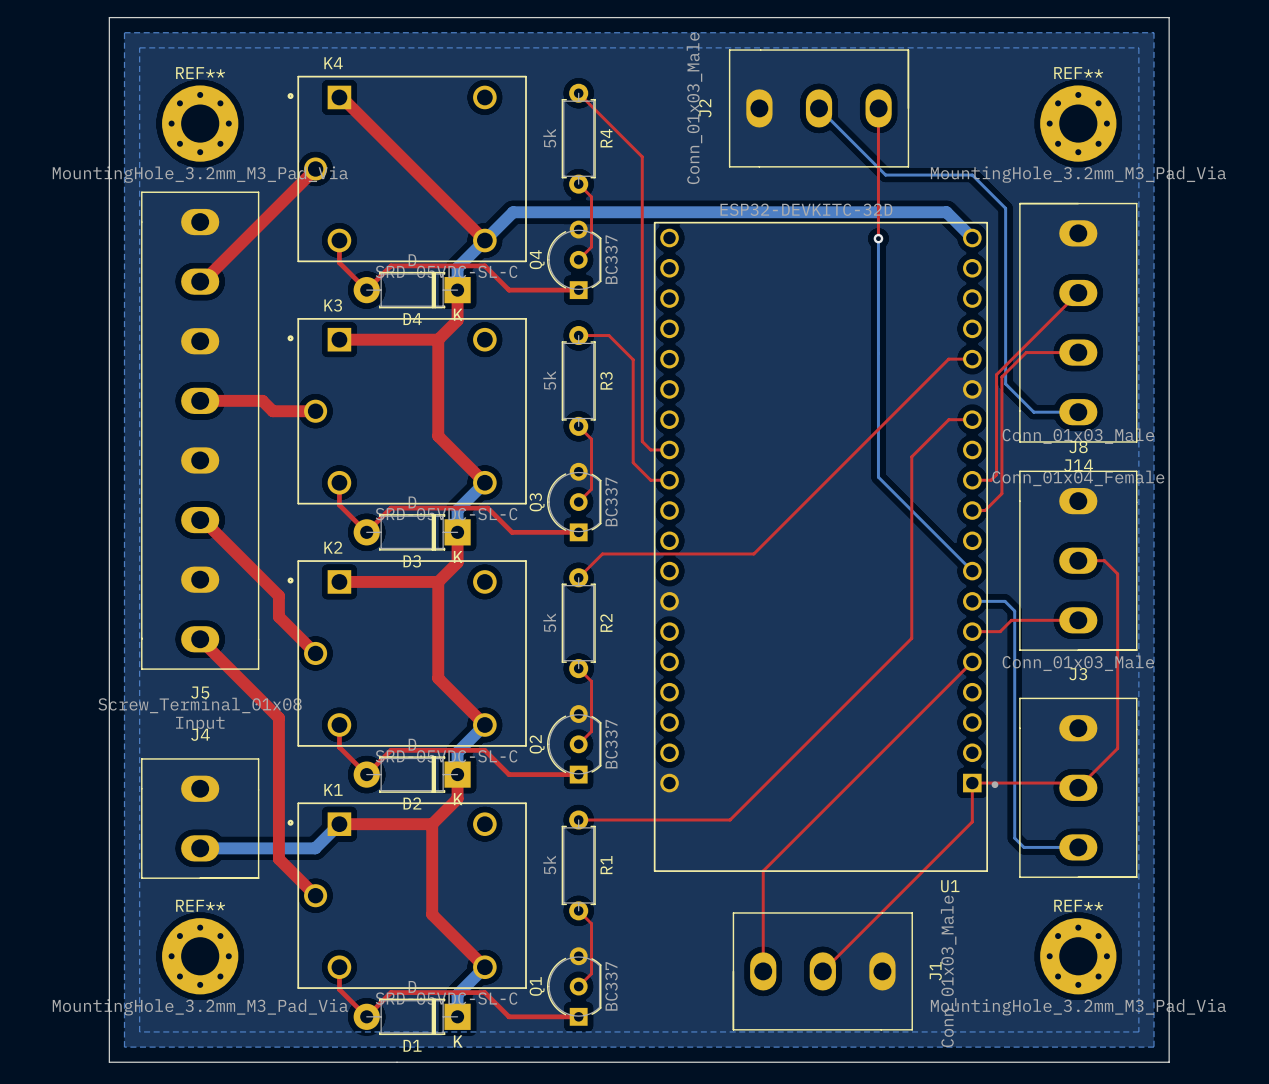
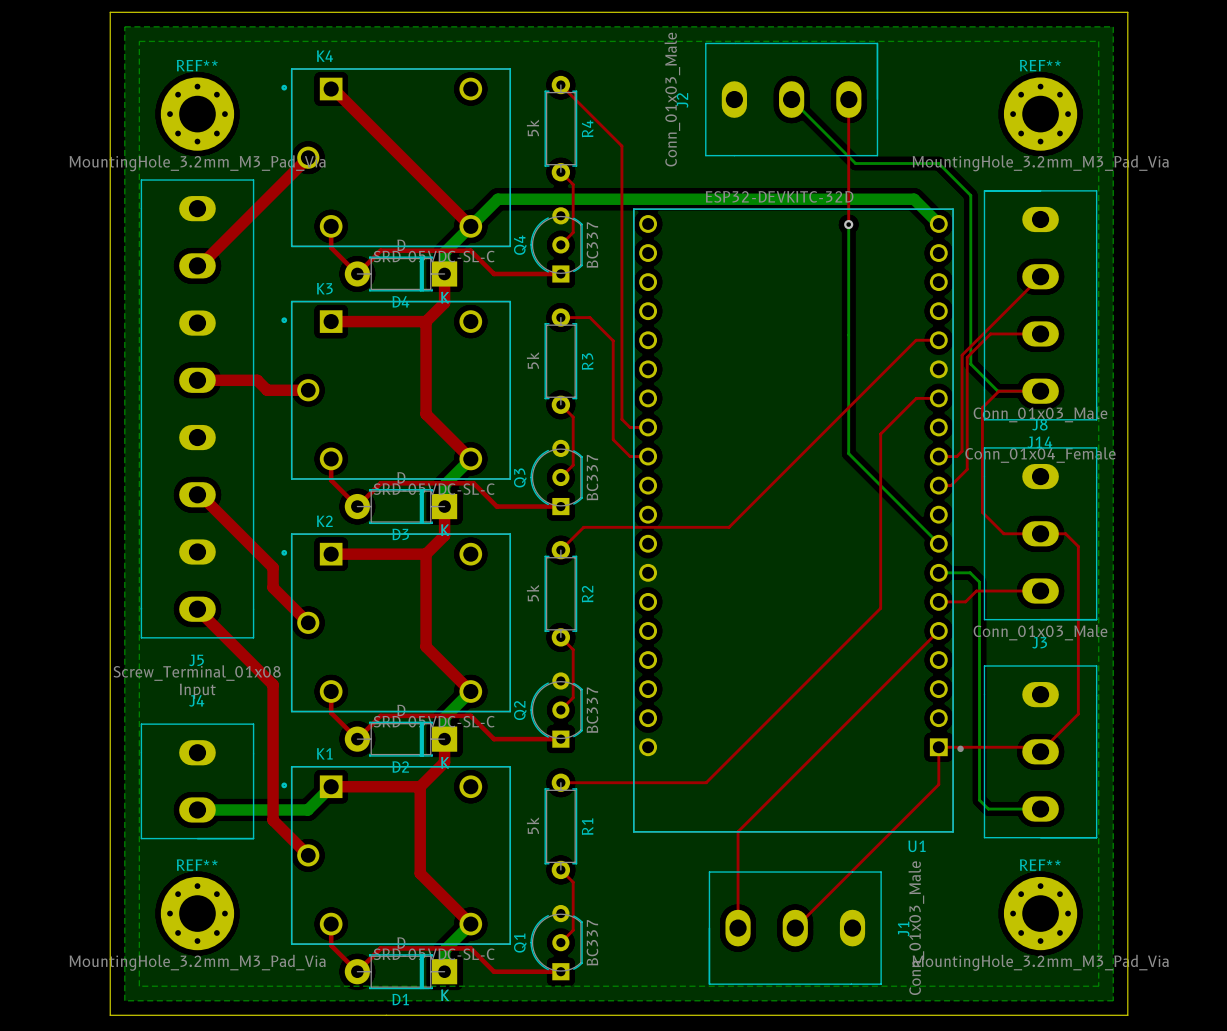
top track: none -> (1040, 391) (998, 391) (982, 407) (982, 512) (1003, 533) (1040, 533)

